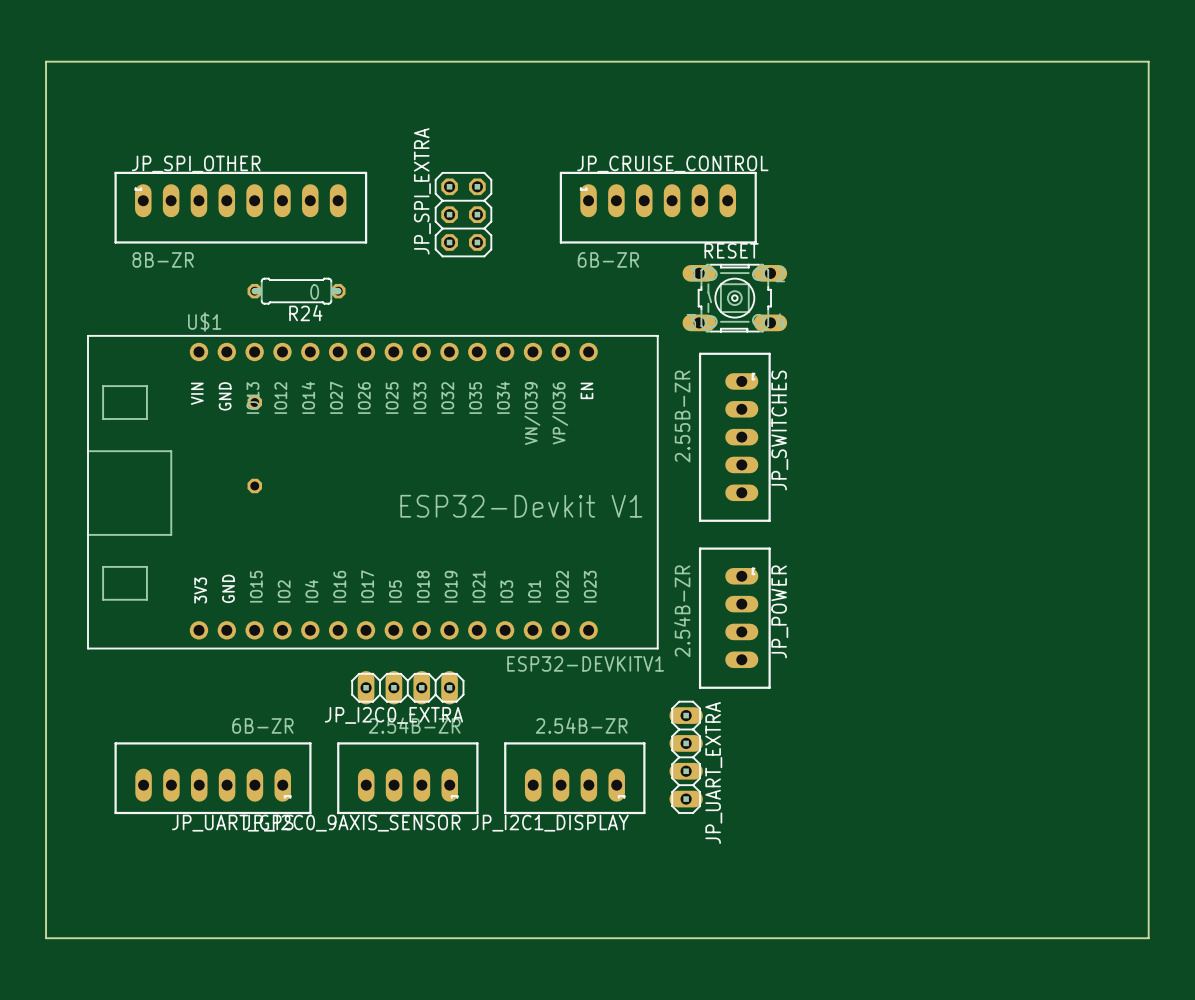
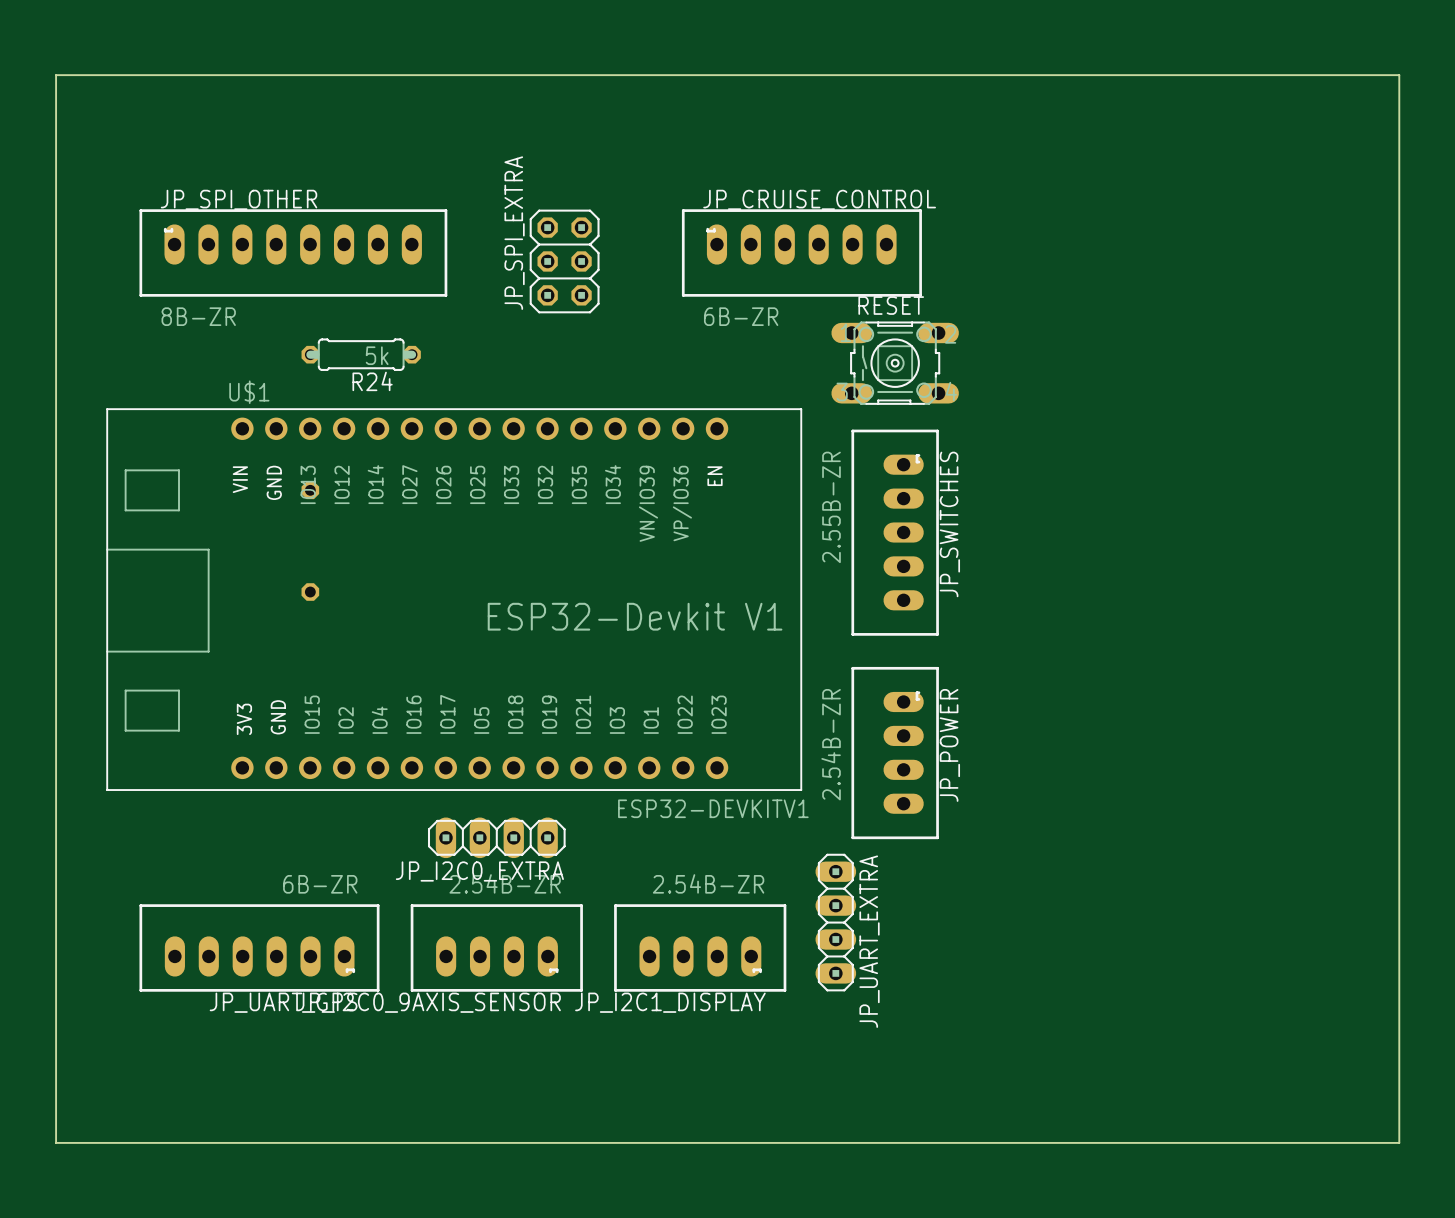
R24 value: 0 (314, 292) -> 5k (377, 355)

